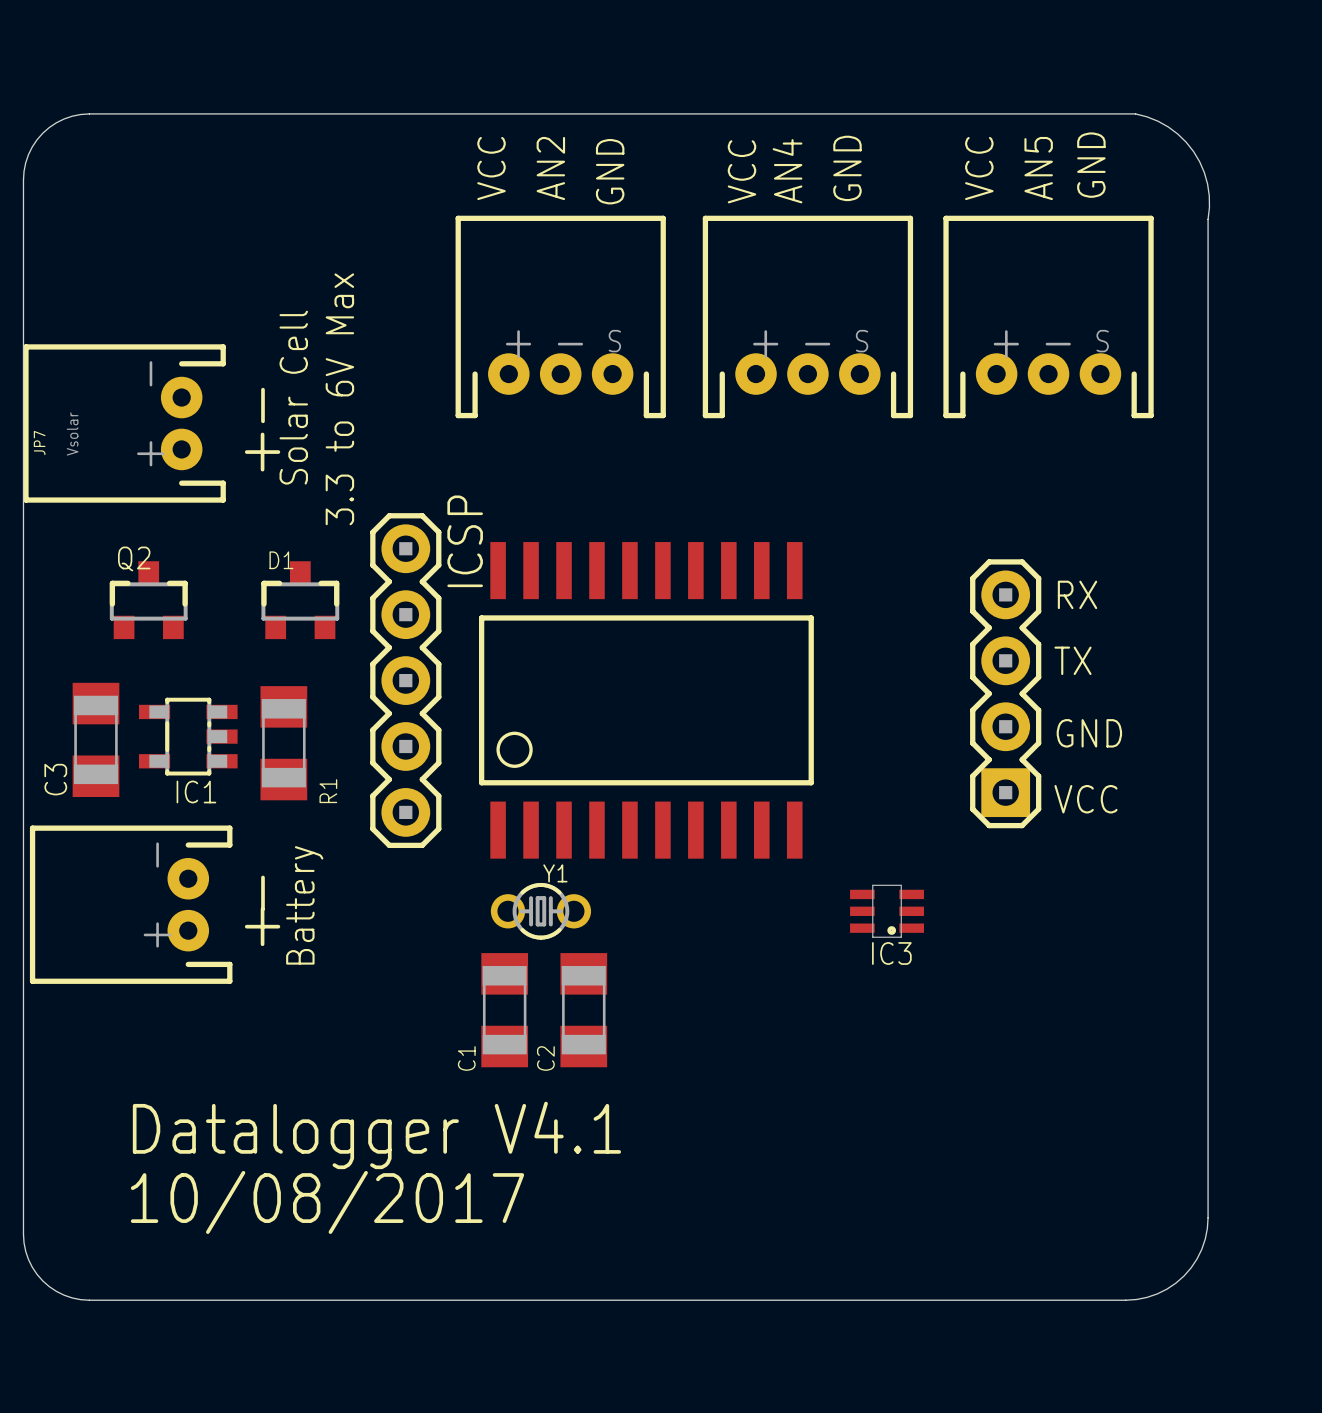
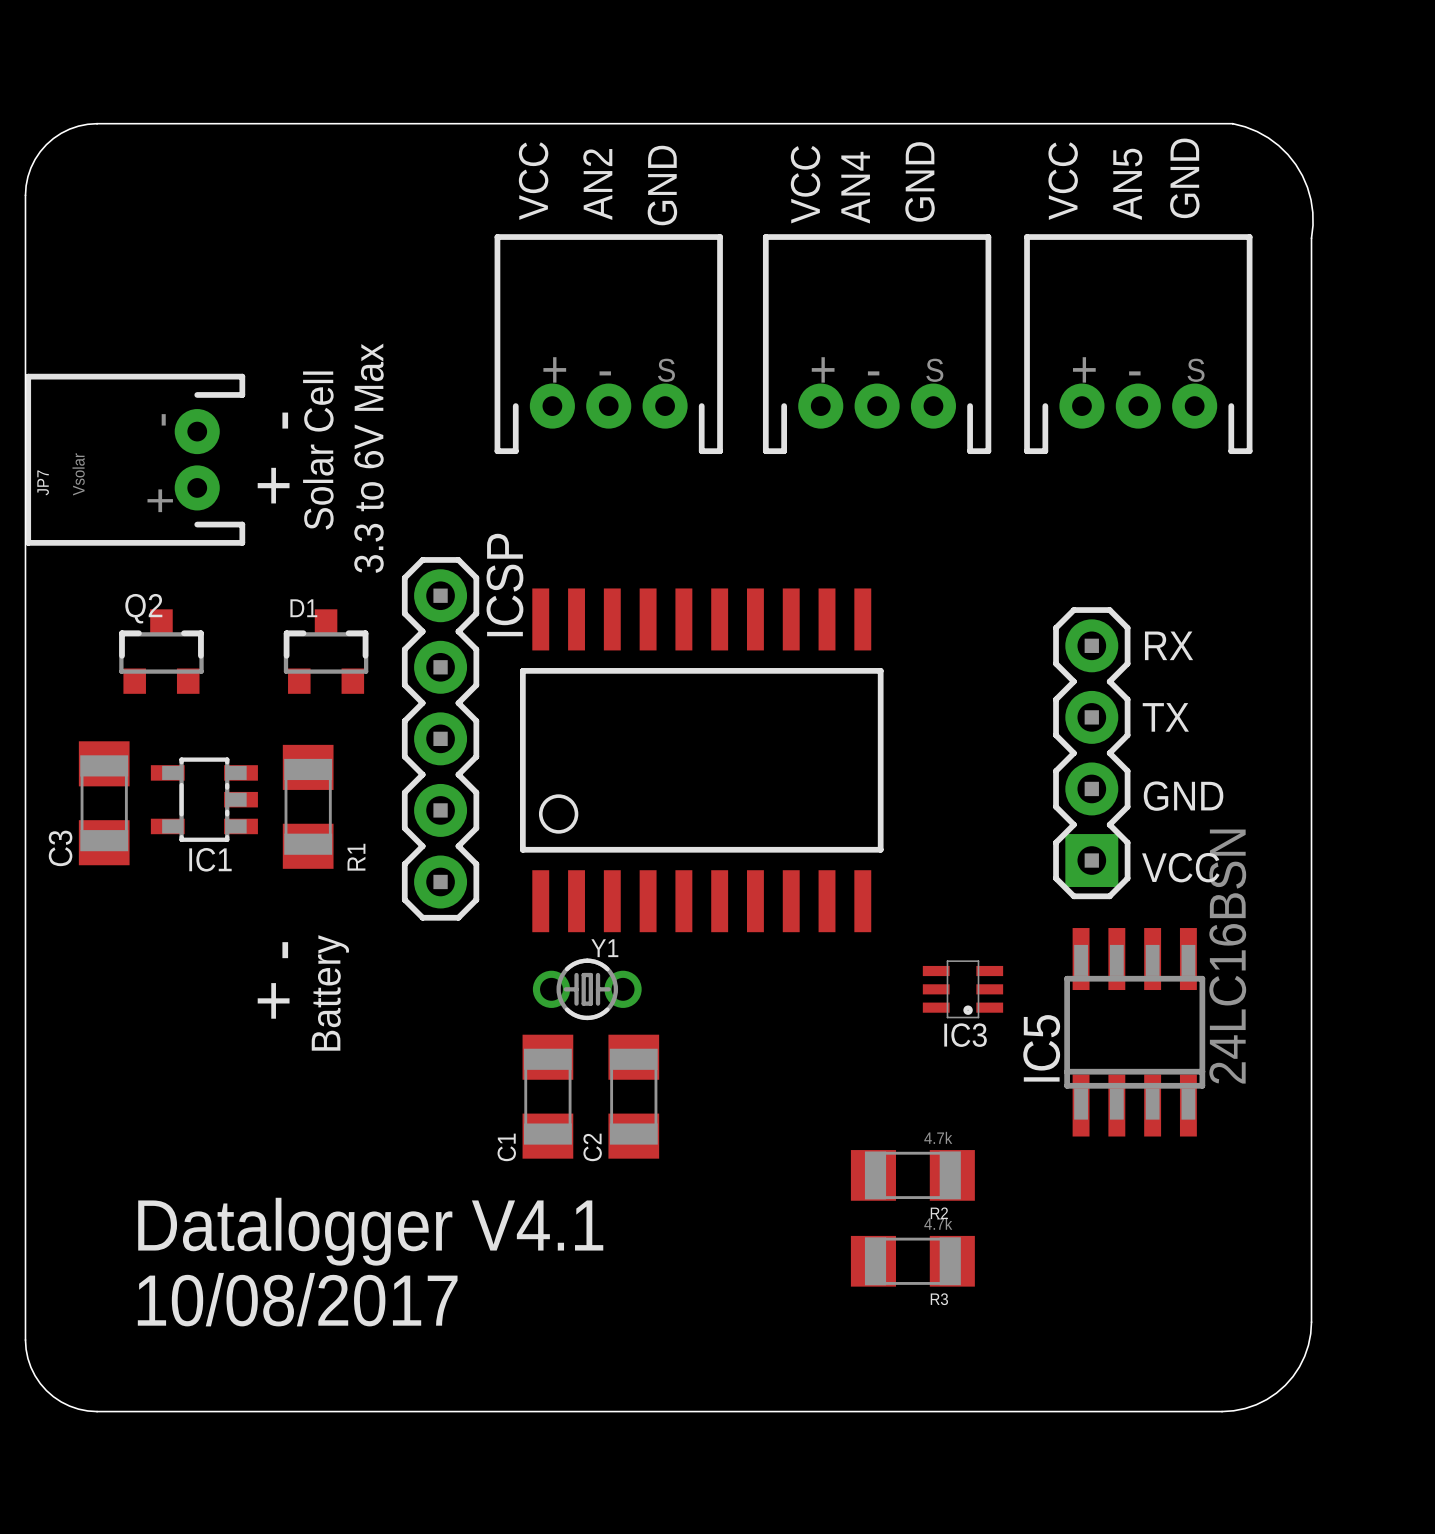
part: (131, 904) -> none
IC5: none -> 24LC16BSN (1134, 1032)
R2: none -> 4.7k (912, 1175)
R3: none -> 4.7k (912, 1261)

